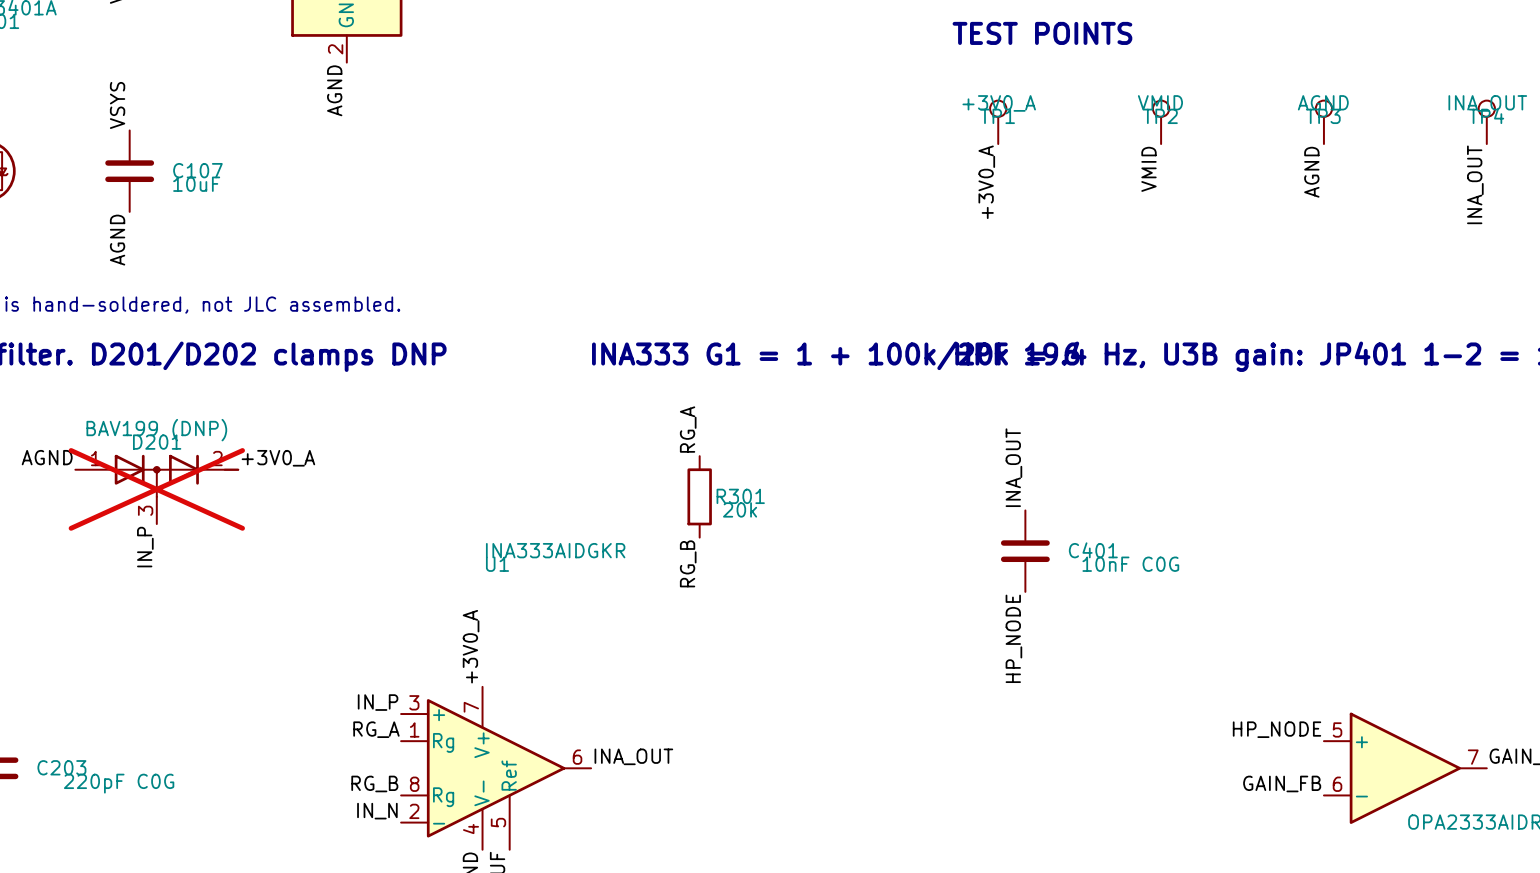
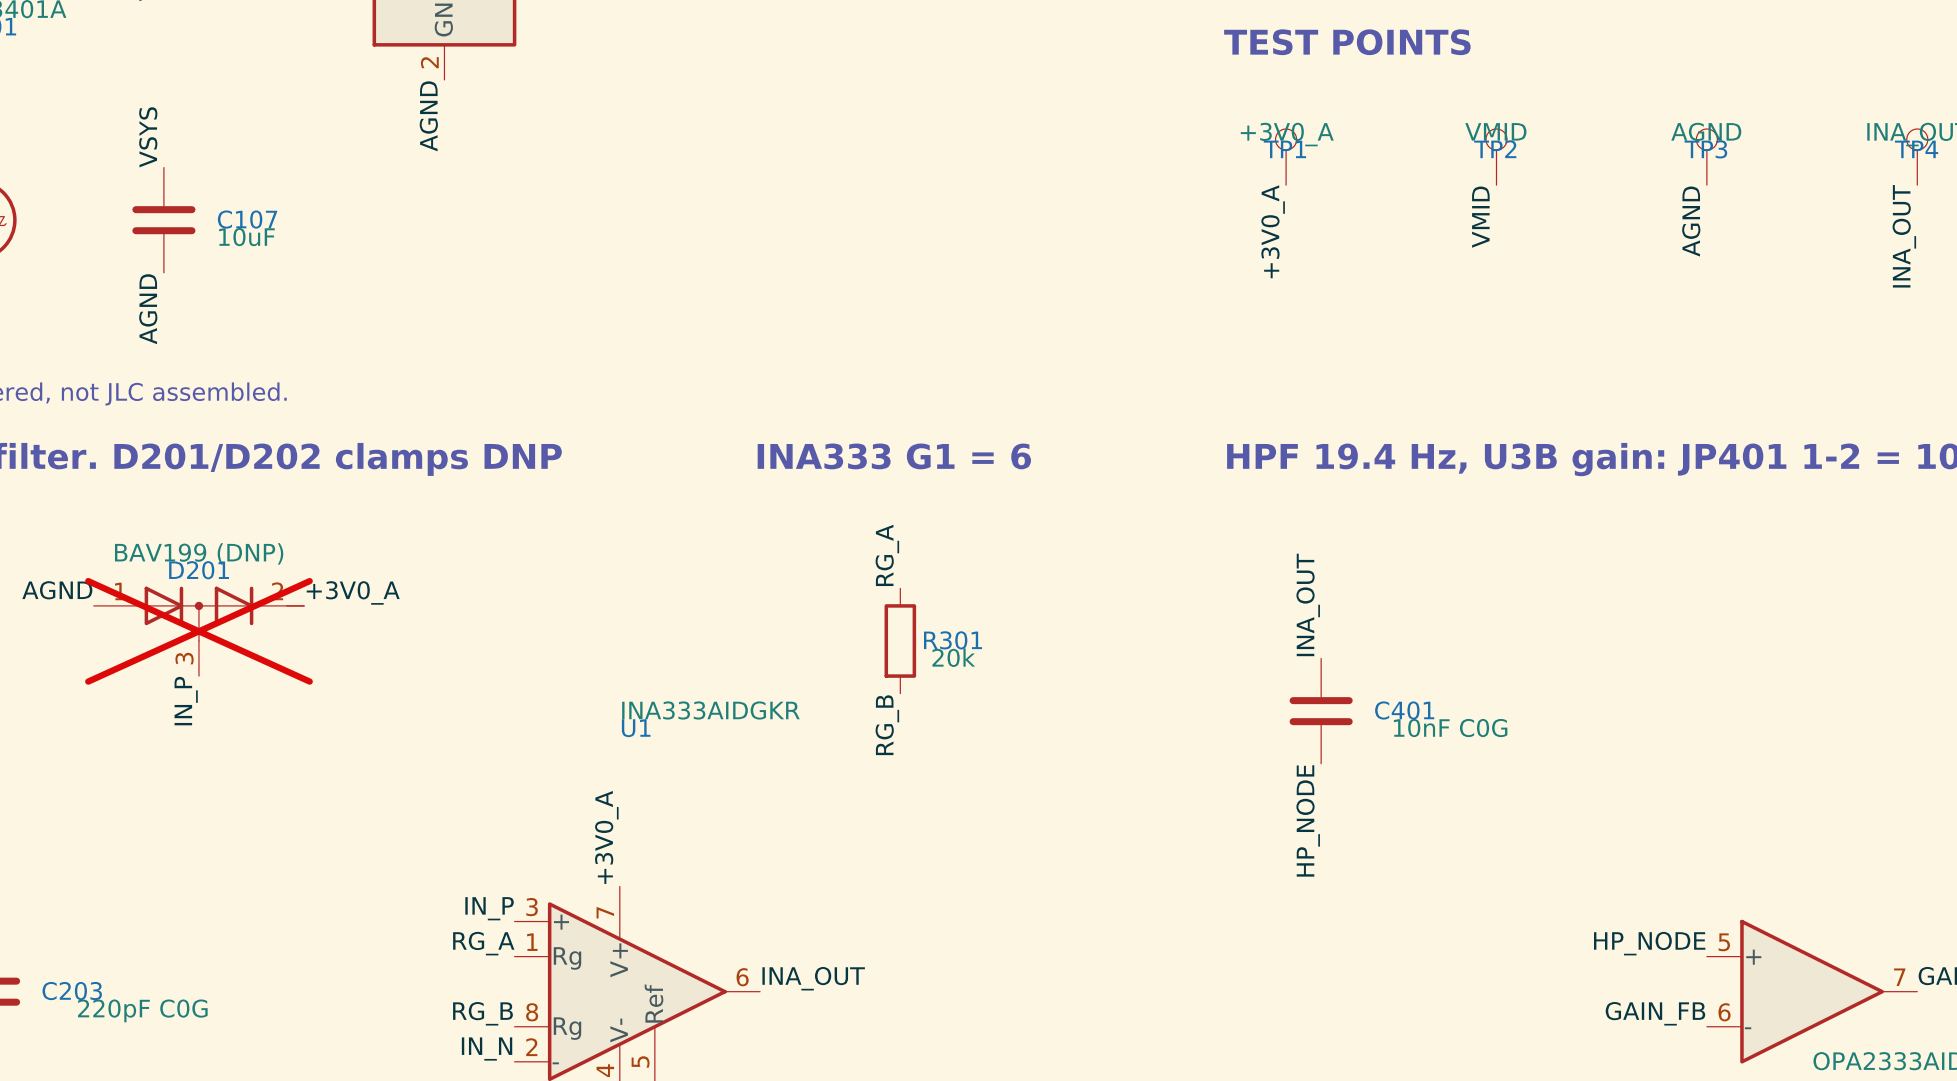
text: INA333 G1 = 1 + 100k/20k = 6 (835, 355) -> INA333 G1 = 6 (894, 456)

